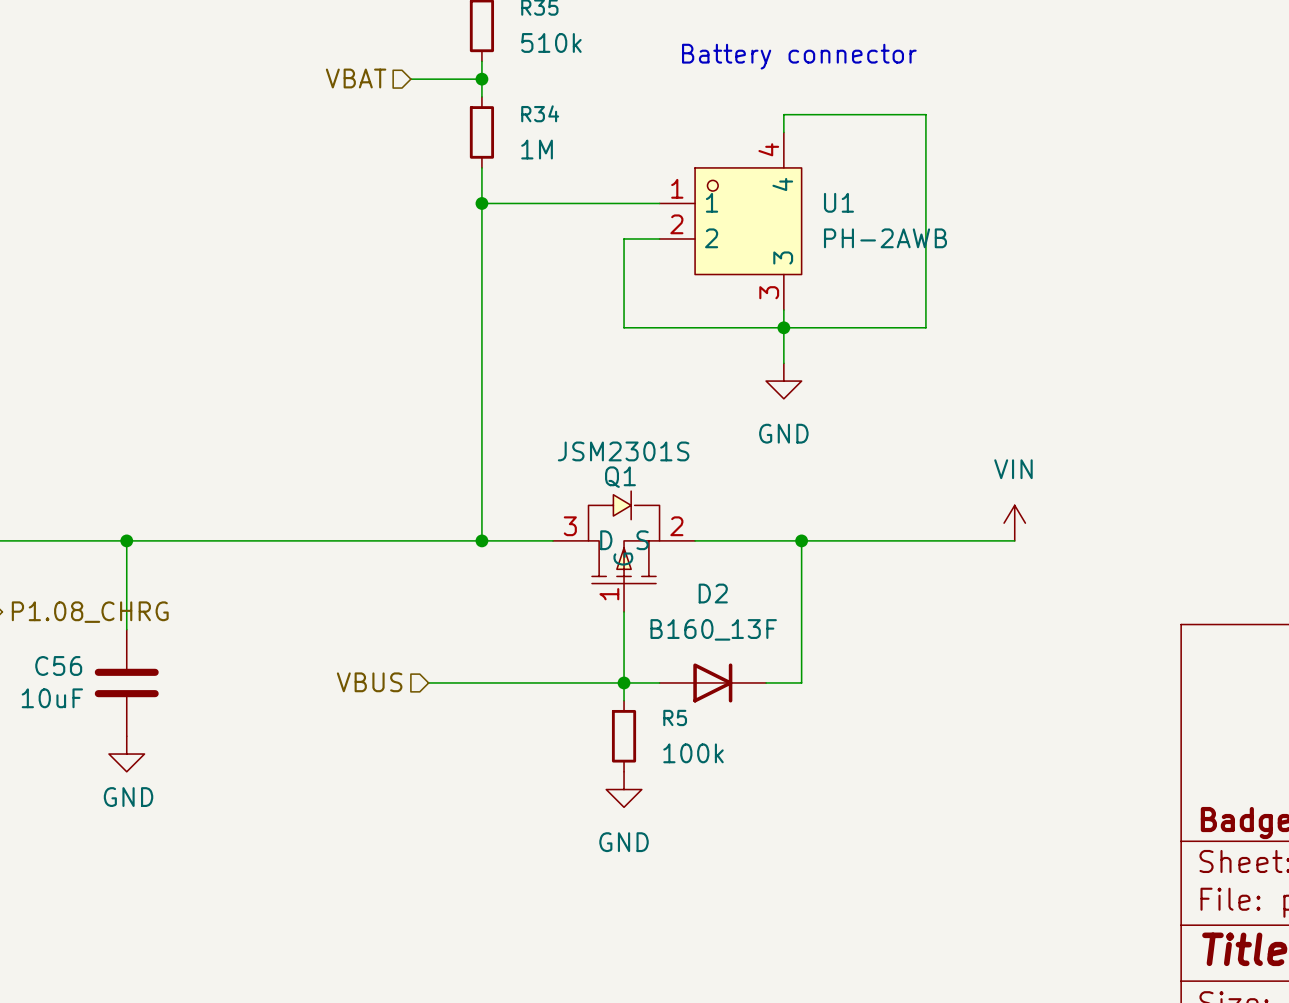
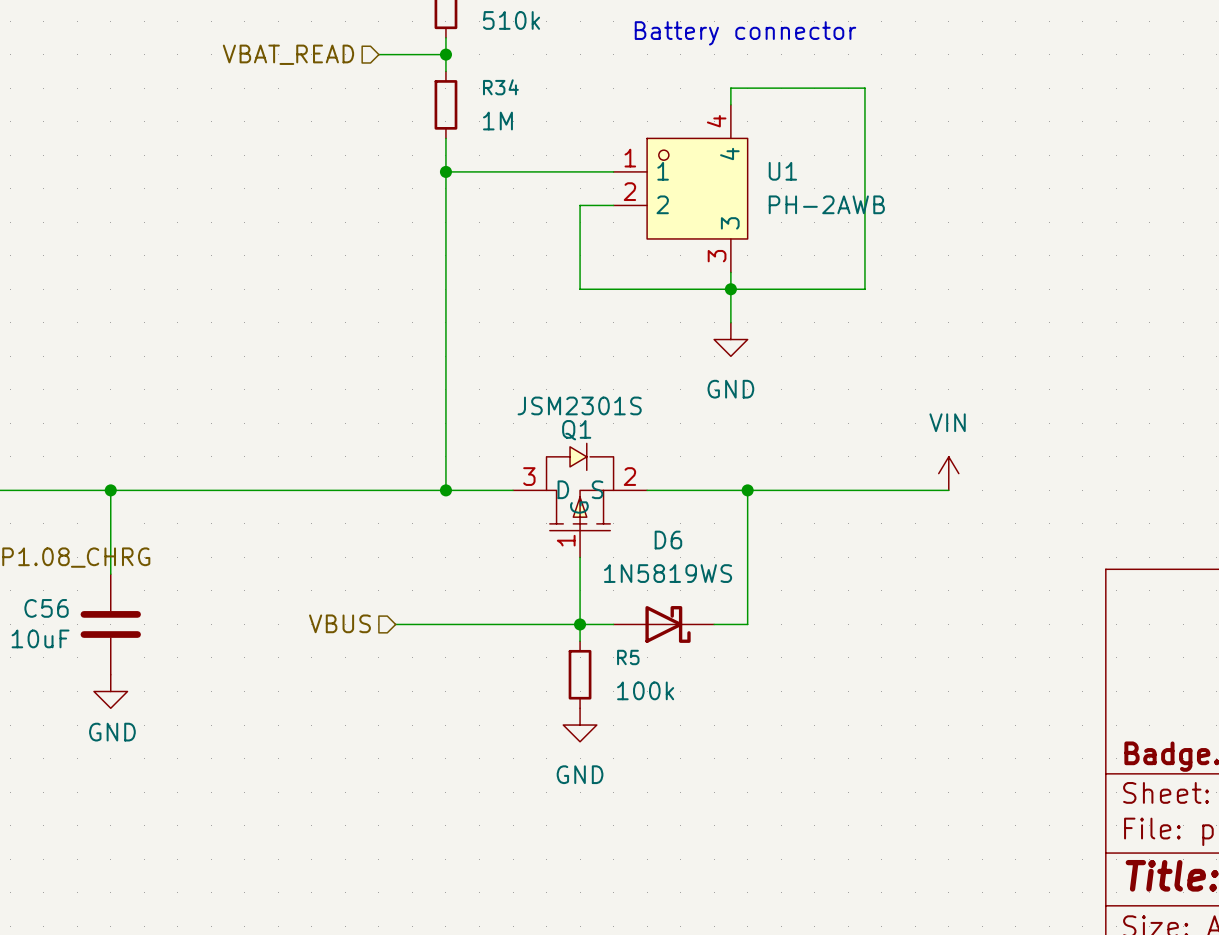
hierarchical label: VBAT (356, 78) -> VBAT_READ (288, 54)
D2: B160_13F (712, 682) -> none
D6: none -> 1N5819WS (663, 624)

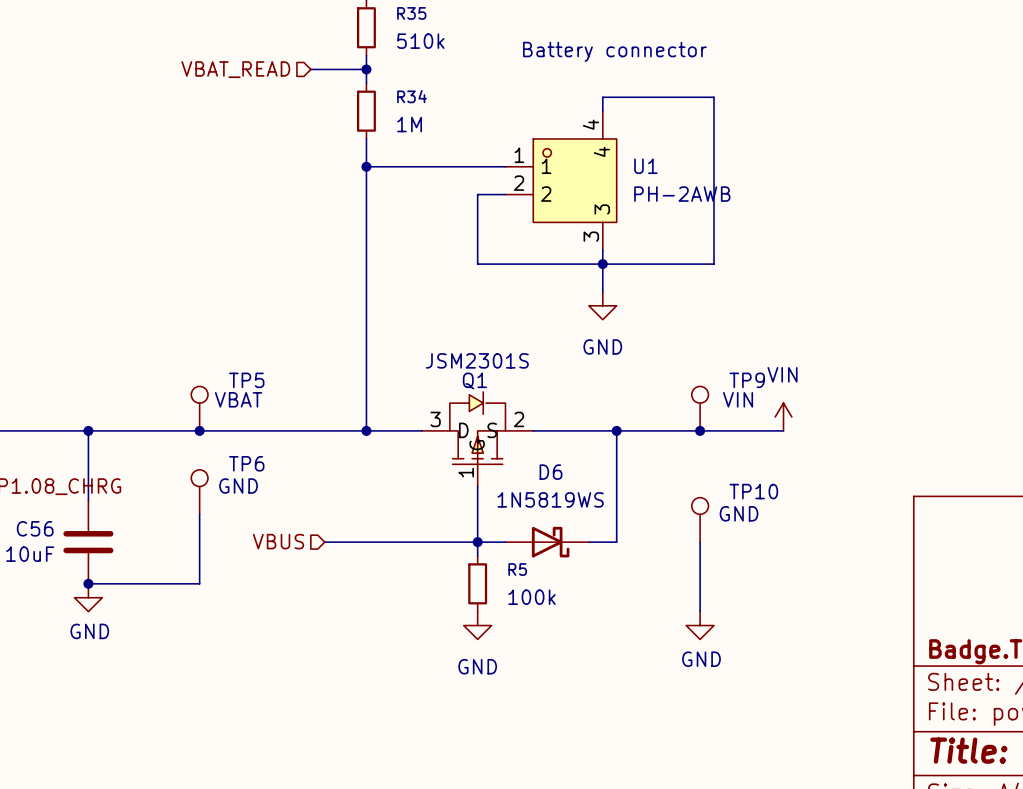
TP5: none -> (199, 408)
TP9: none -> (700, 408)
junction: none -> (199, 430)
junction: none -> (700, 430)
TP6: none -> (199, 492)
wire: none -> (199, 514) (199, 583) (88, 583)
TP10: none -> (700, 519)
wire: none -> (700, 542) (700, 611)
junction: none -> (88, 583)
power symbol: none -> GND (700, 625)

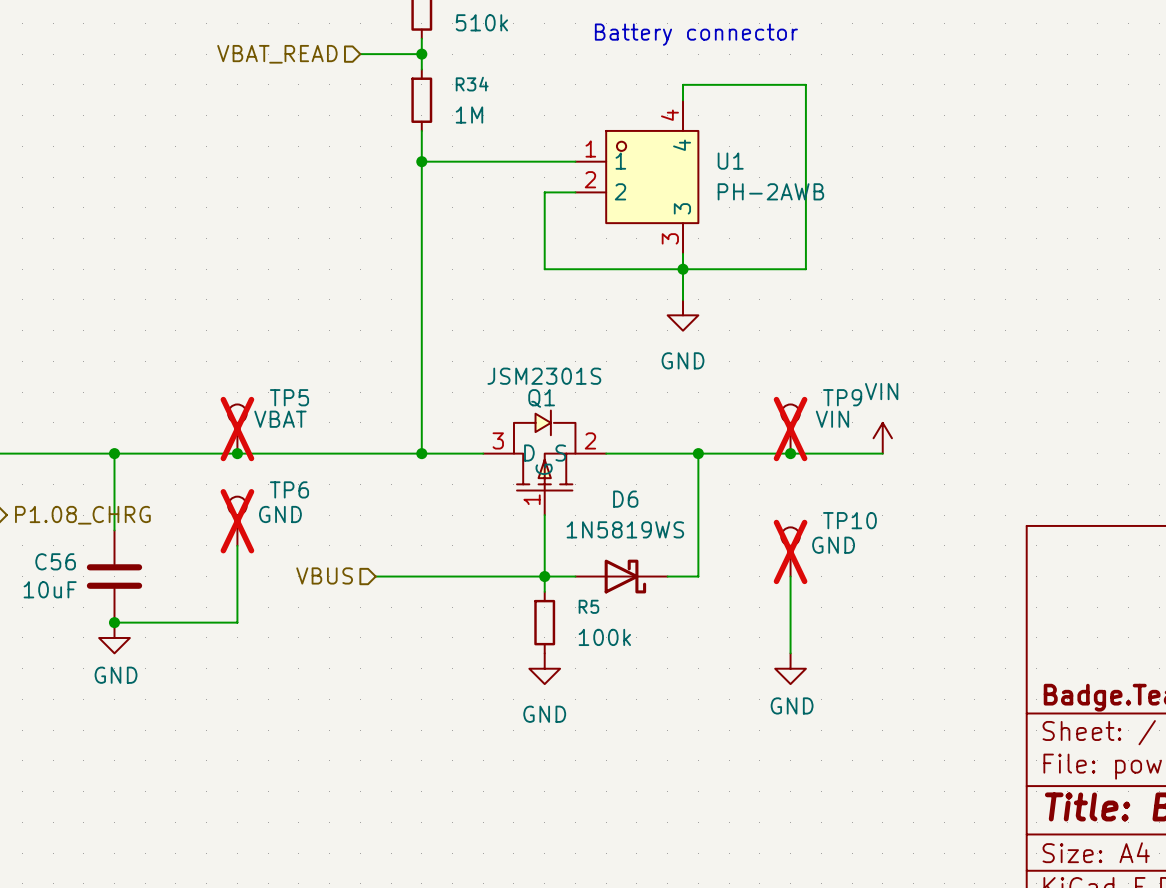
TP5 do-not-place cross: none -> (237, 429)
TP9 do-not-place cross: none -> (790, 429)
TP6 do-not-place cross: none -> (237, 521)
TP10 do-not-place cross: none -> (790, 551)

